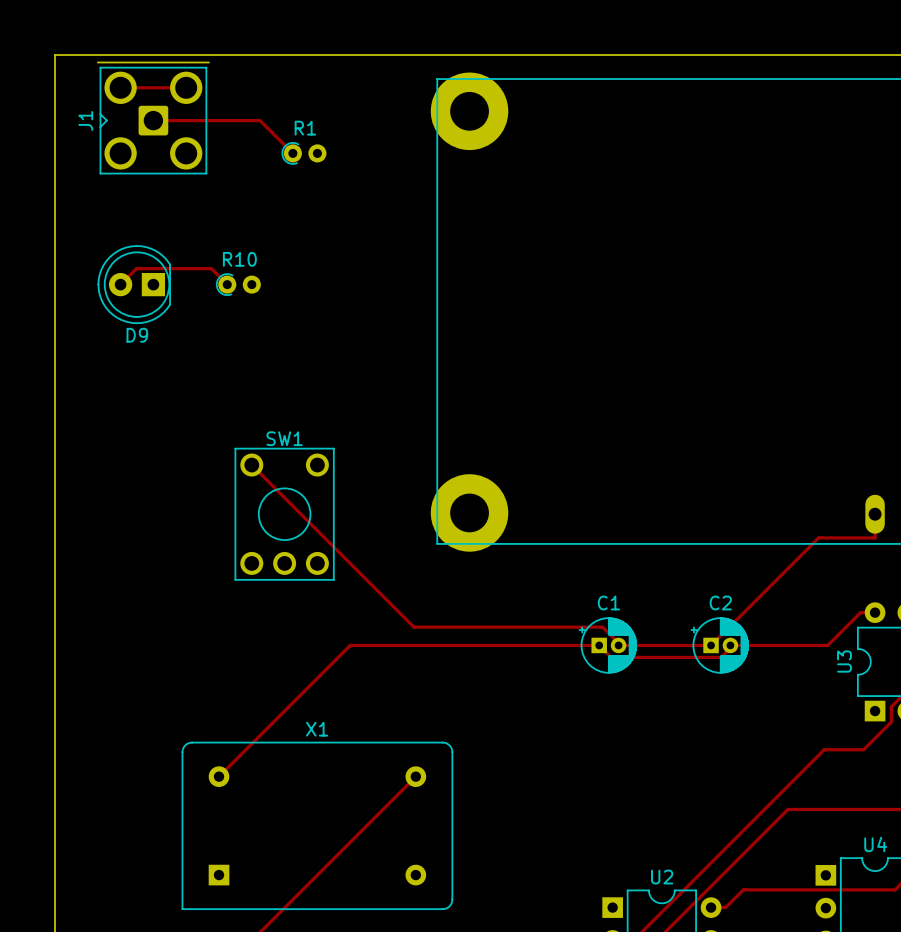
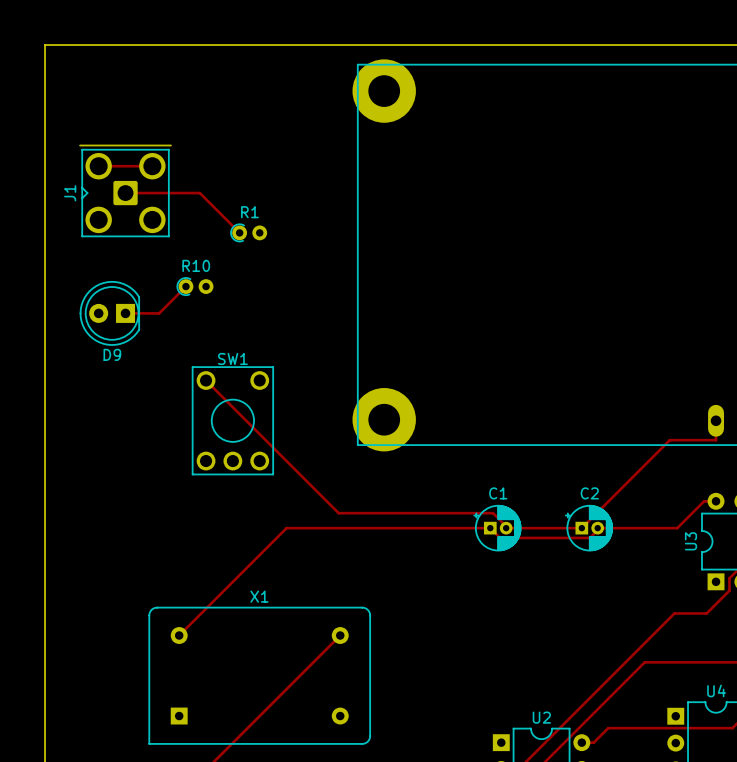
track: (120, 87) (186, 87) -> (98, 166) (152, 166)
J1 position: (153, 118) -> (125, 190)
track: (153, 120) (260, 120) (292, 153) -> none
R1 position: (304, 153) -> (248, 232)
track: none -> (125, 193) (199, 193) (239, 232)
track: (120, 284) (136, 268) (211, 268) (227, 284) -> none
D9 position: (134, 284) -> (109, 313)
R10 position: (238, 284) -> (195, 286)
track: none -> (185, 286) (159, 313) (125, 313)

